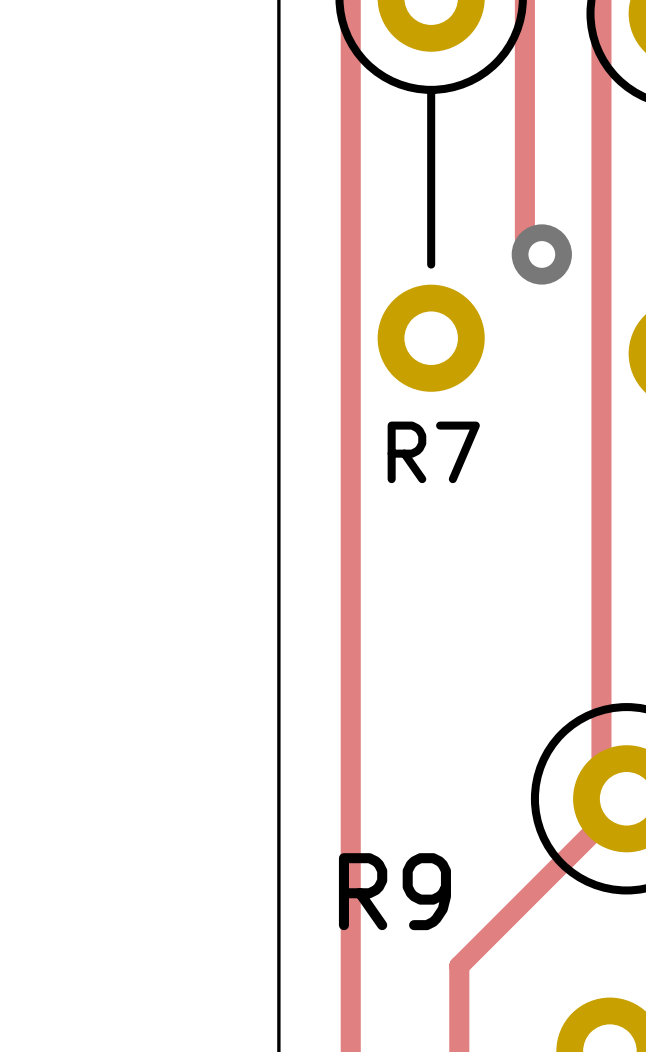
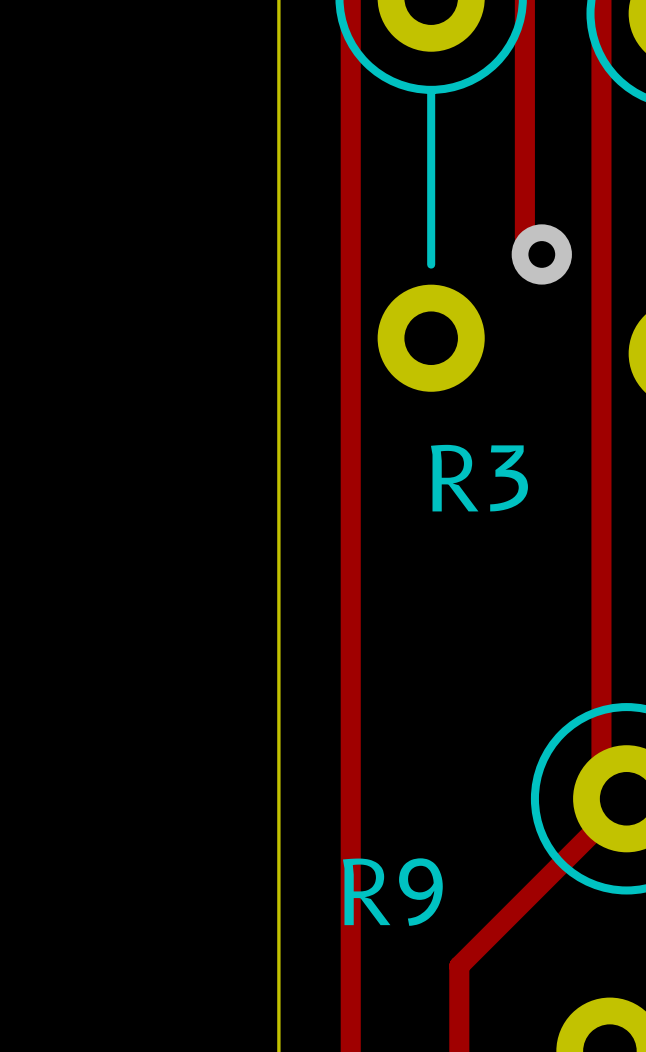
R7 name: R7 (433, 452) -> none
R3 name: none -> R3 (479, 478)

